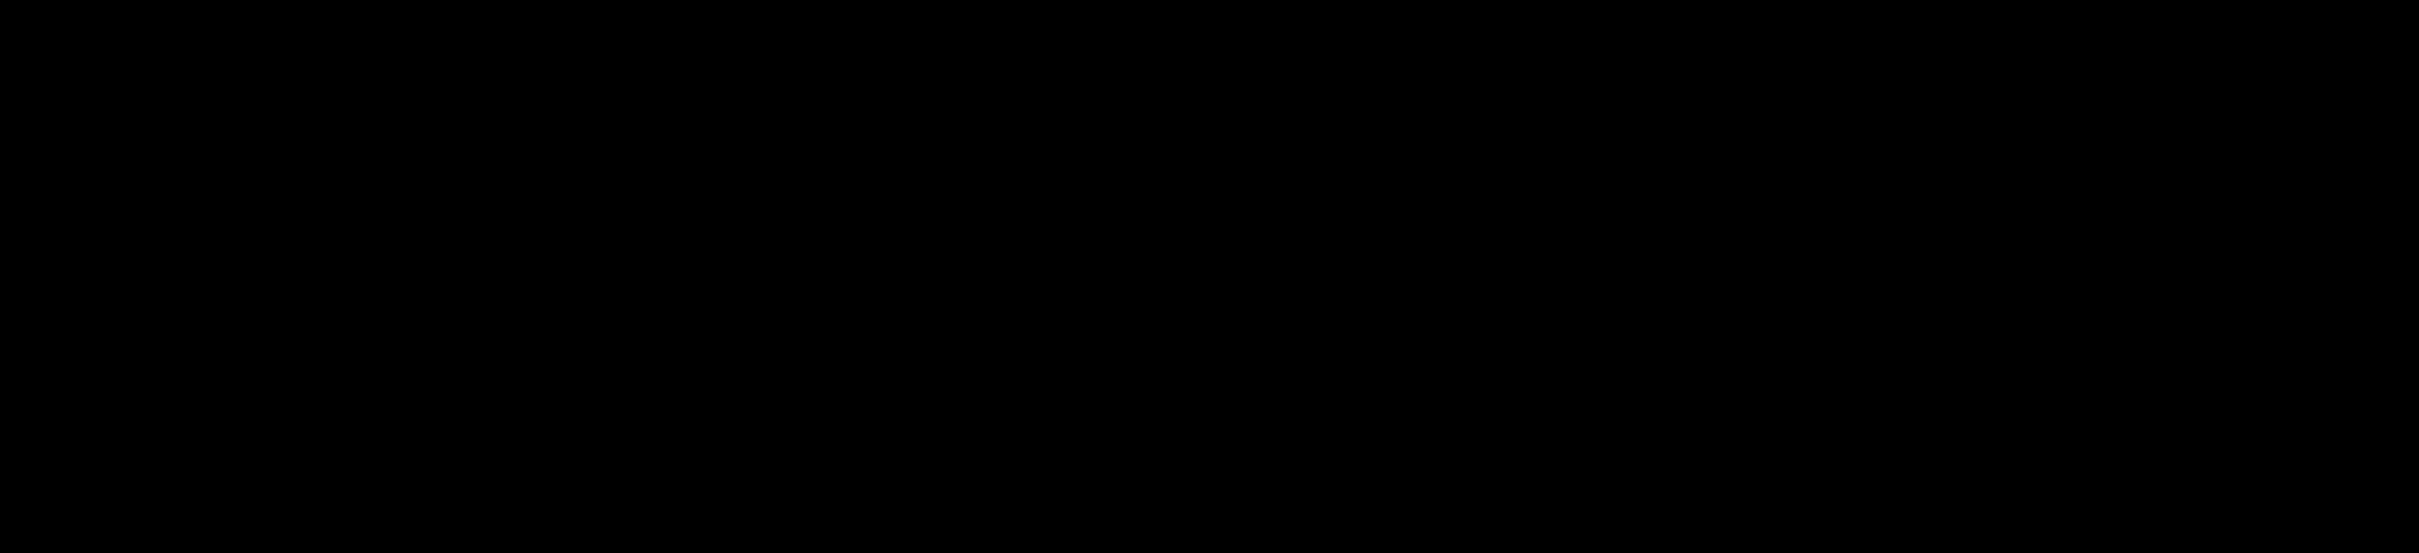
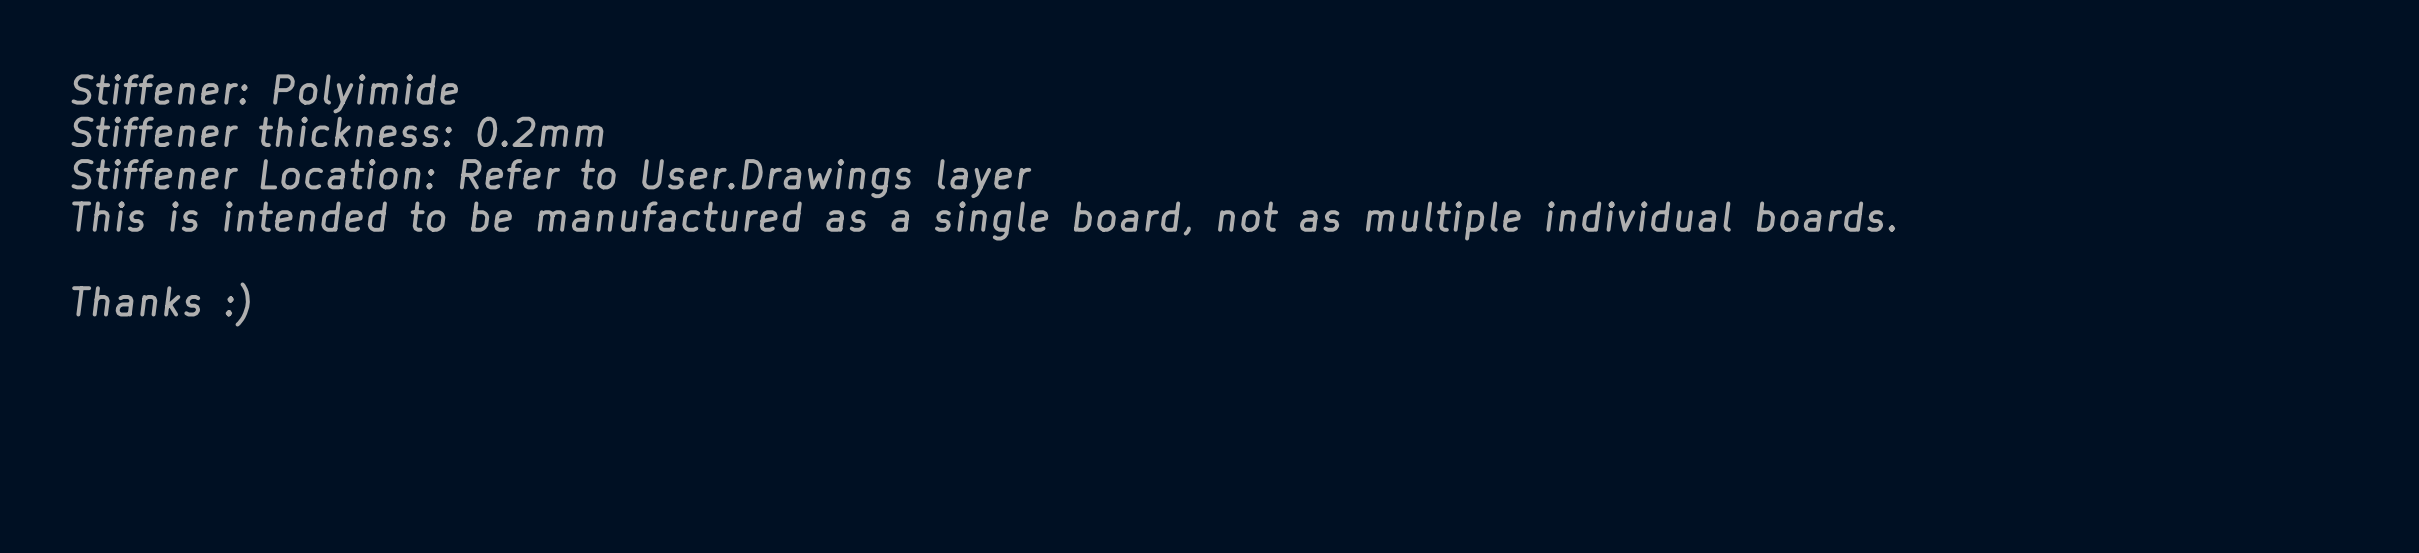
text: none -> Stiffener: Polyimide (264, 93)
text: none -> Stiffener thickness: 0.2mm (337, 131)
text: none -> Stiffener Location: Refer to User.Drawings layer (551, 178)
text: none -> This is intended to be manufactured as a single board, not as multiple individual boards. (983, 220)
text: none -> Thanks :) (161, 304)

